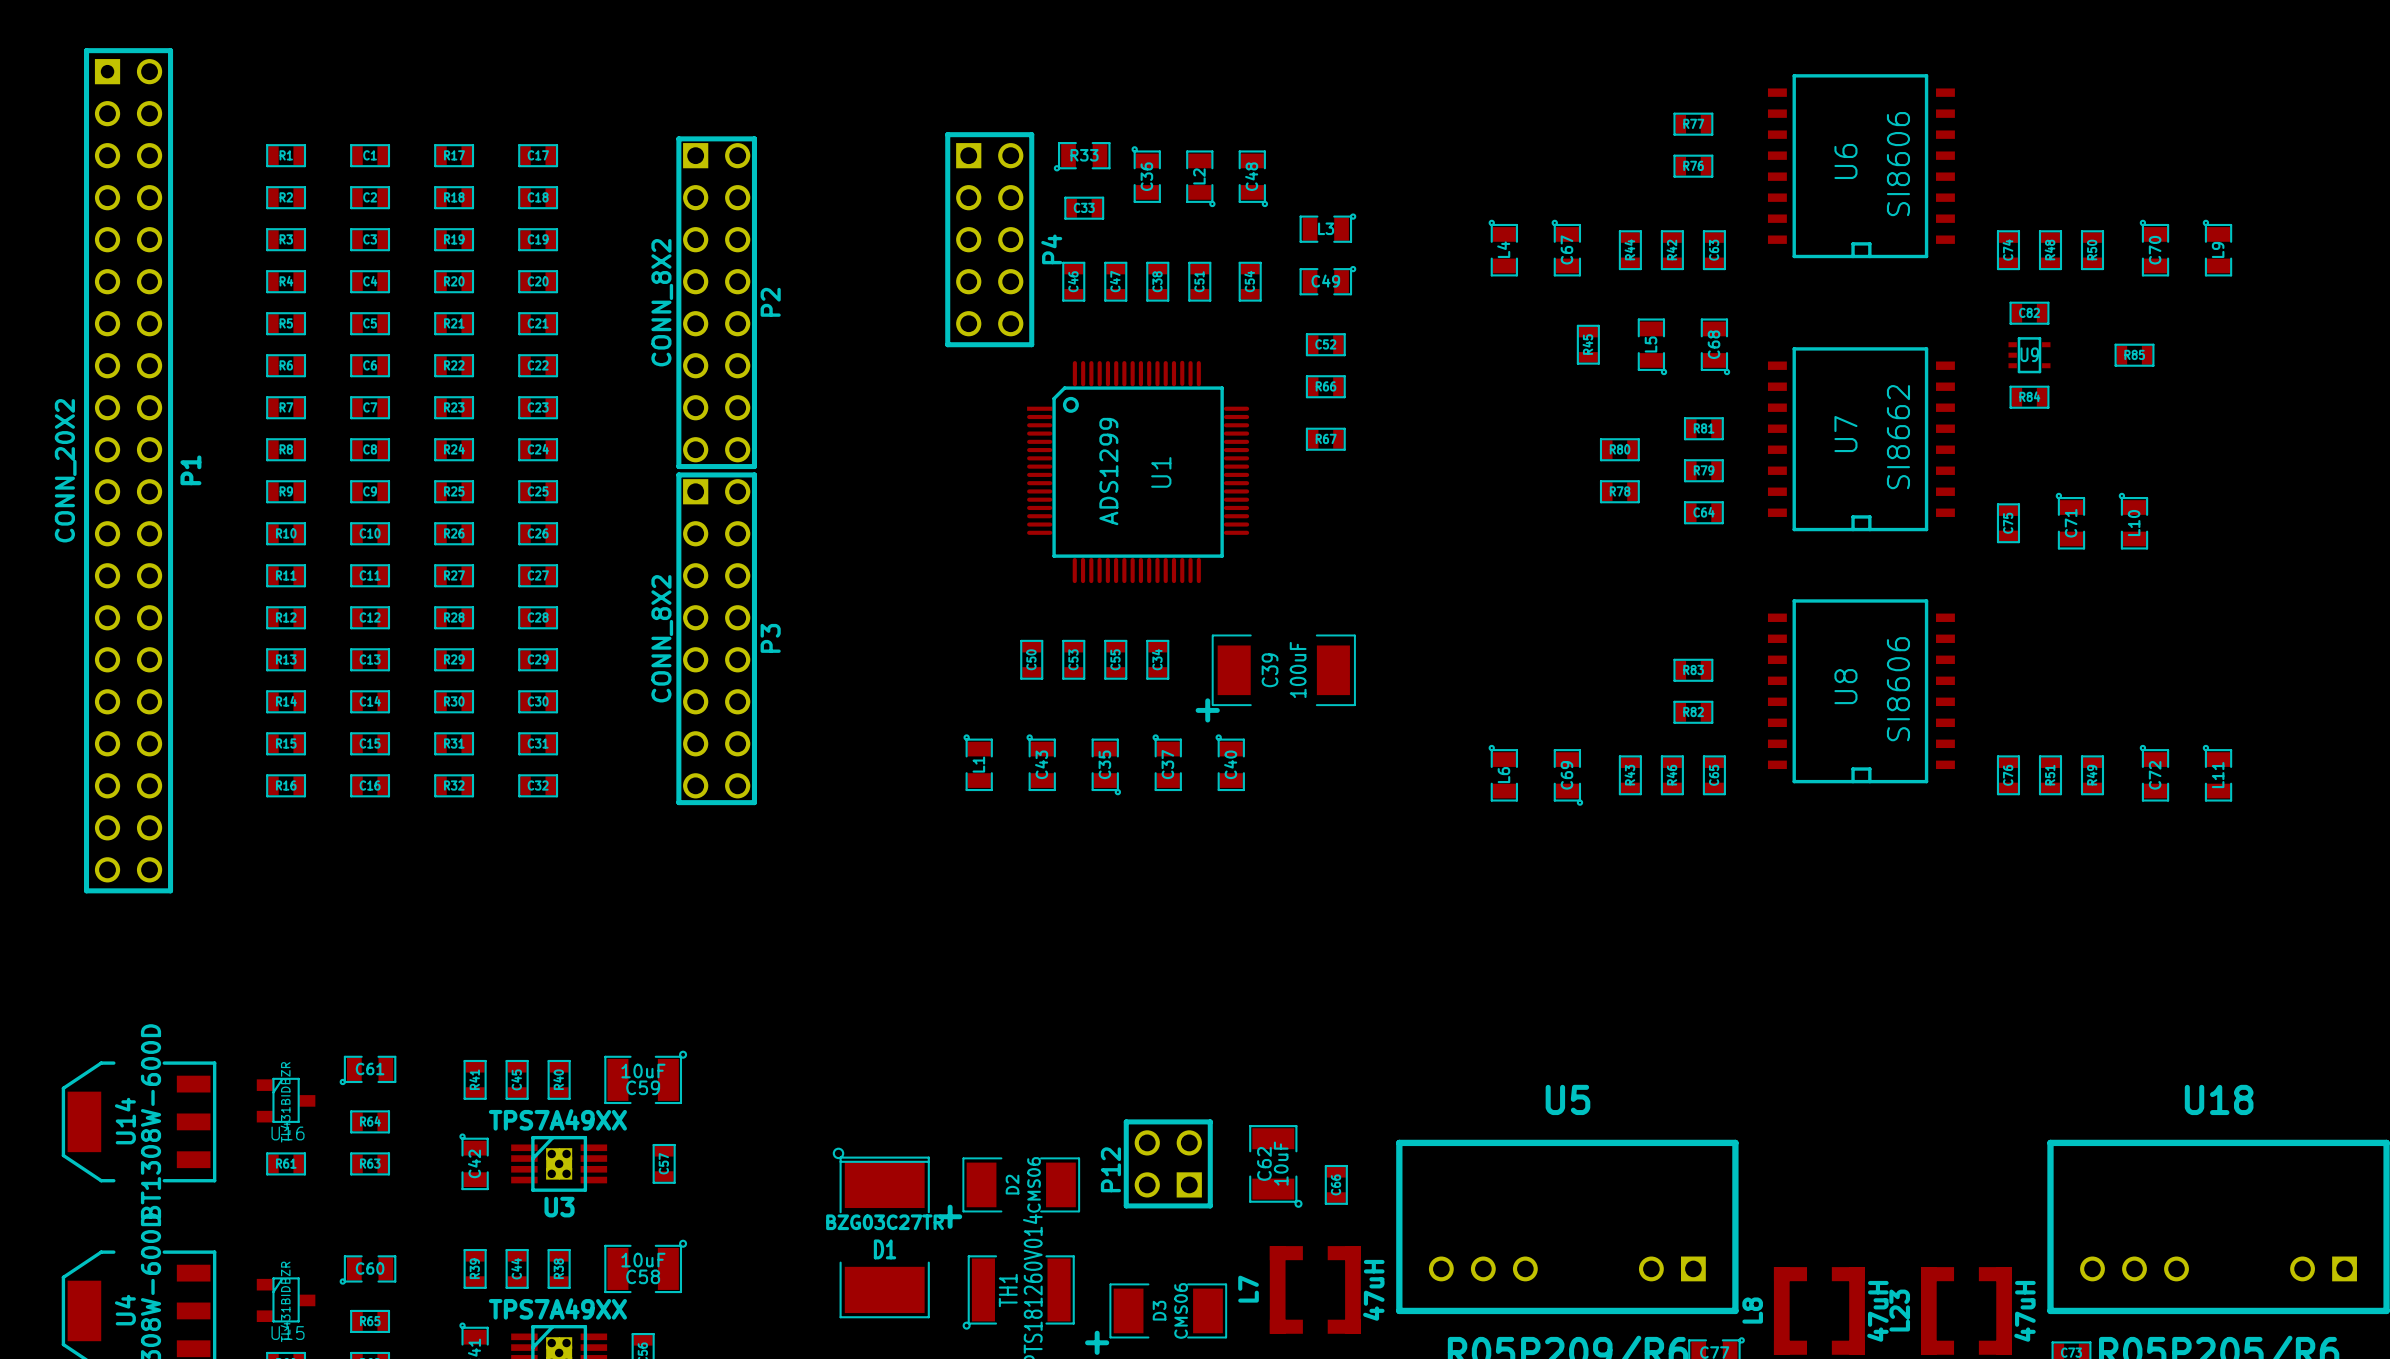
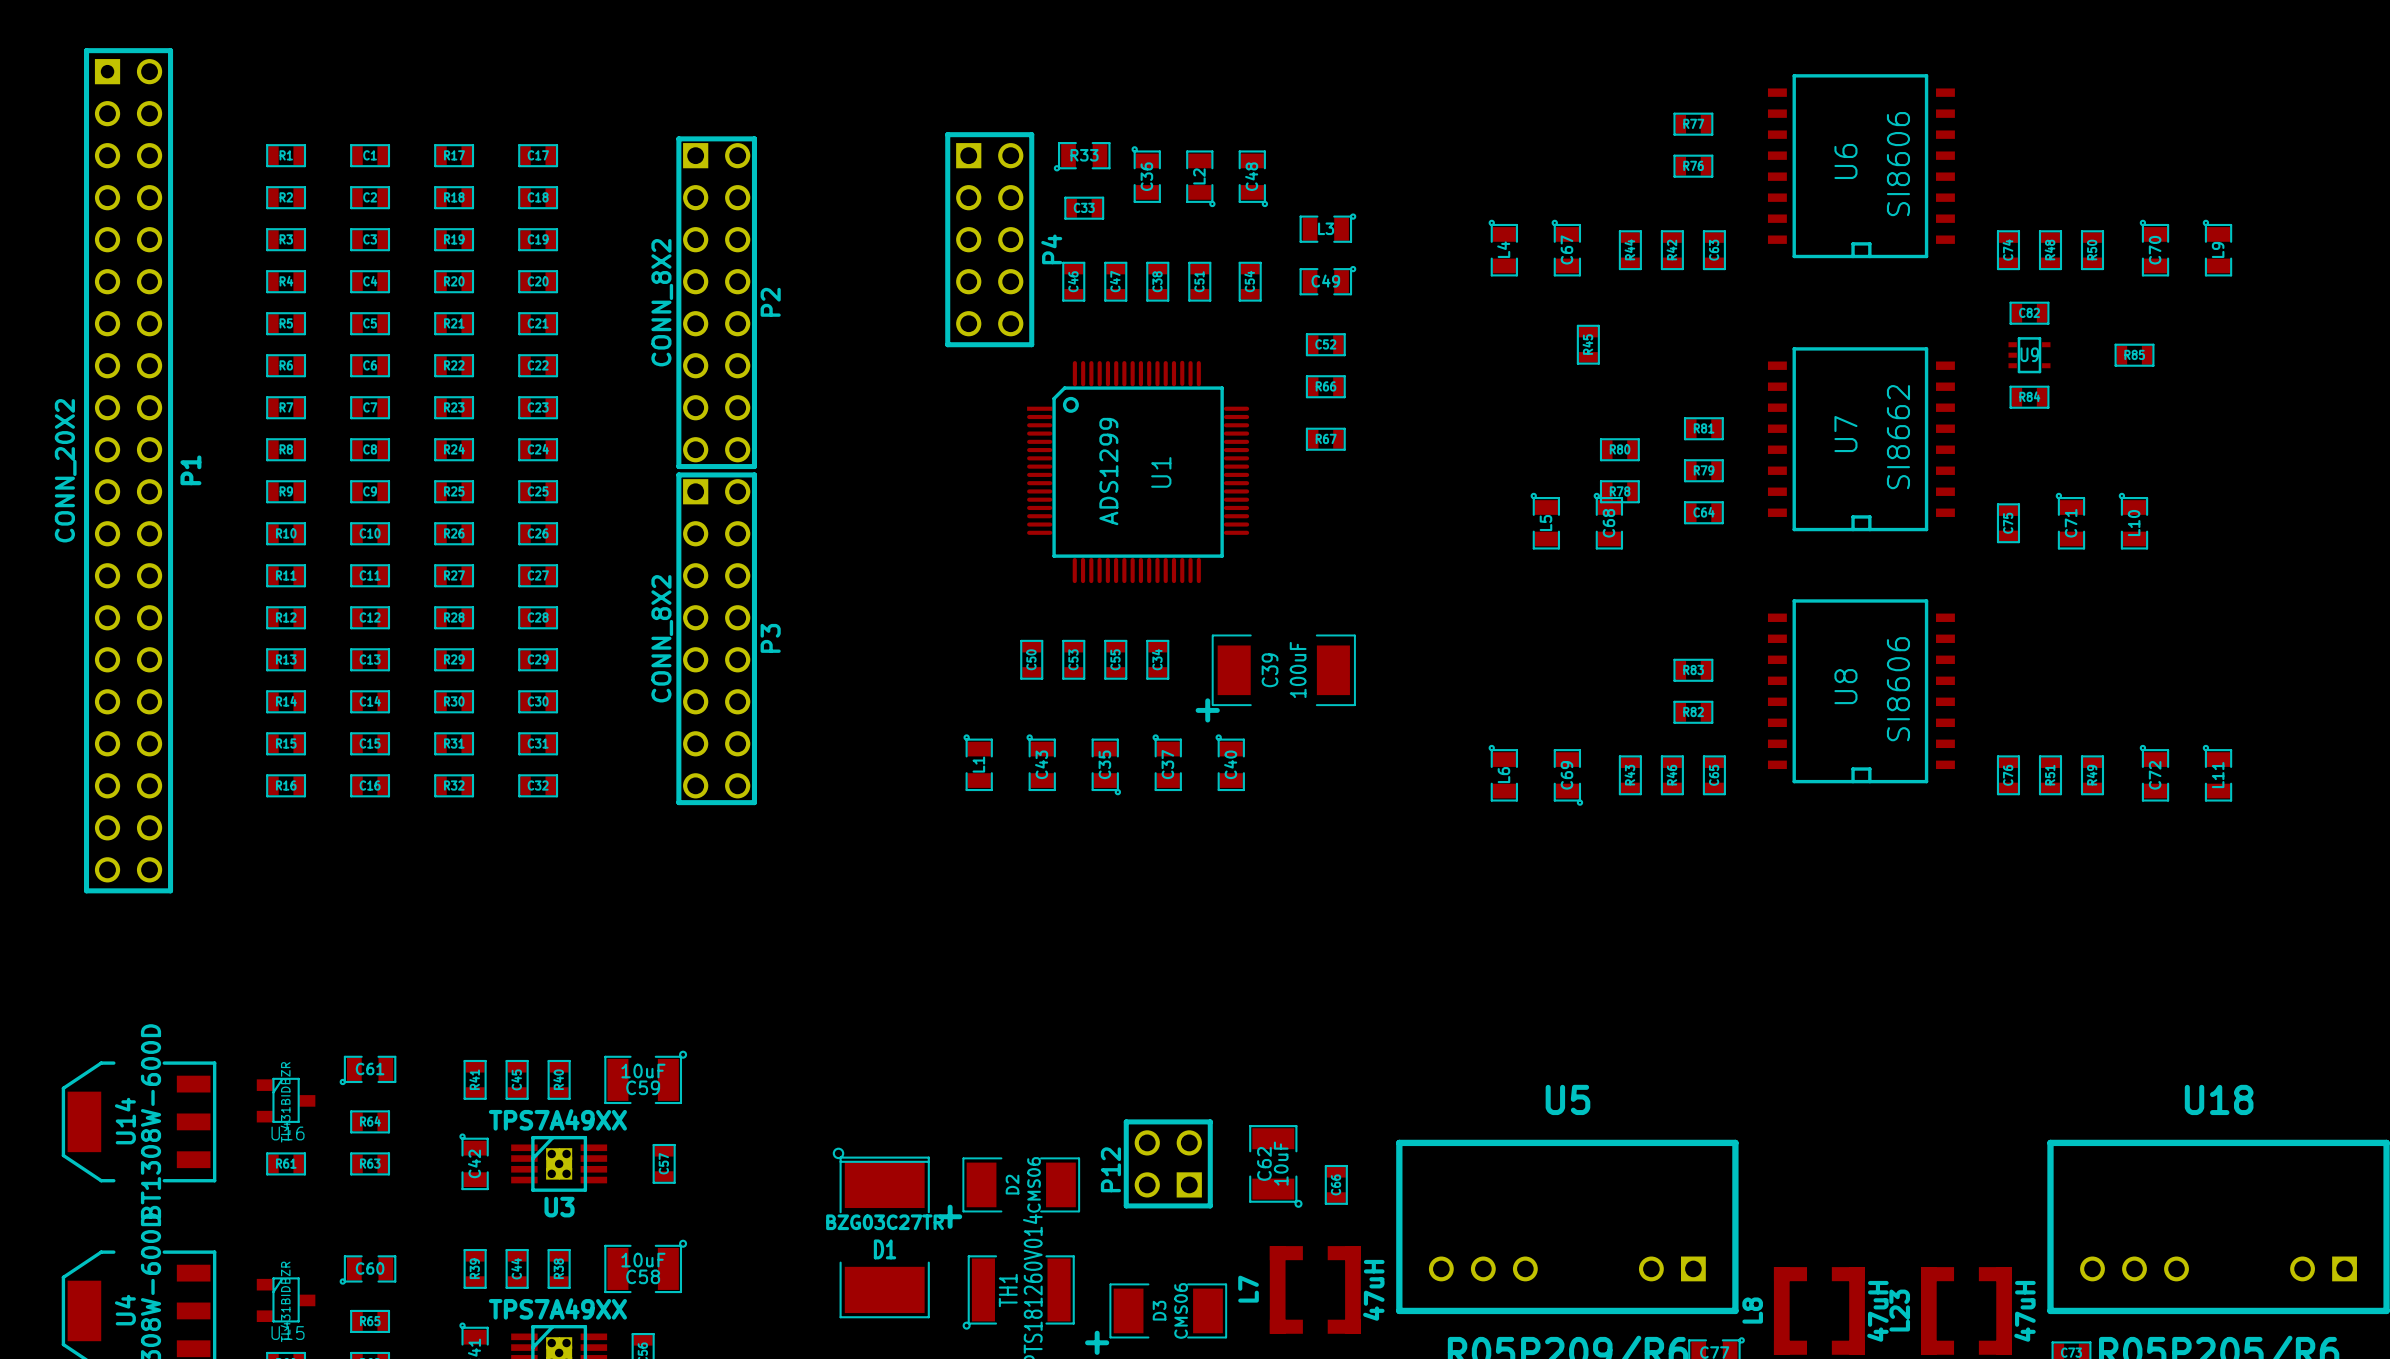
L5 rotation: 0° (1652, 346) -> 180° (1545, 521)
L5 position: (1652, 346) -> (1545, 521)
C68 rotation: 0° (1715, 346) -> 180° (1608, 521)
C68 position: (1715, 346) -> (1608, 521)

